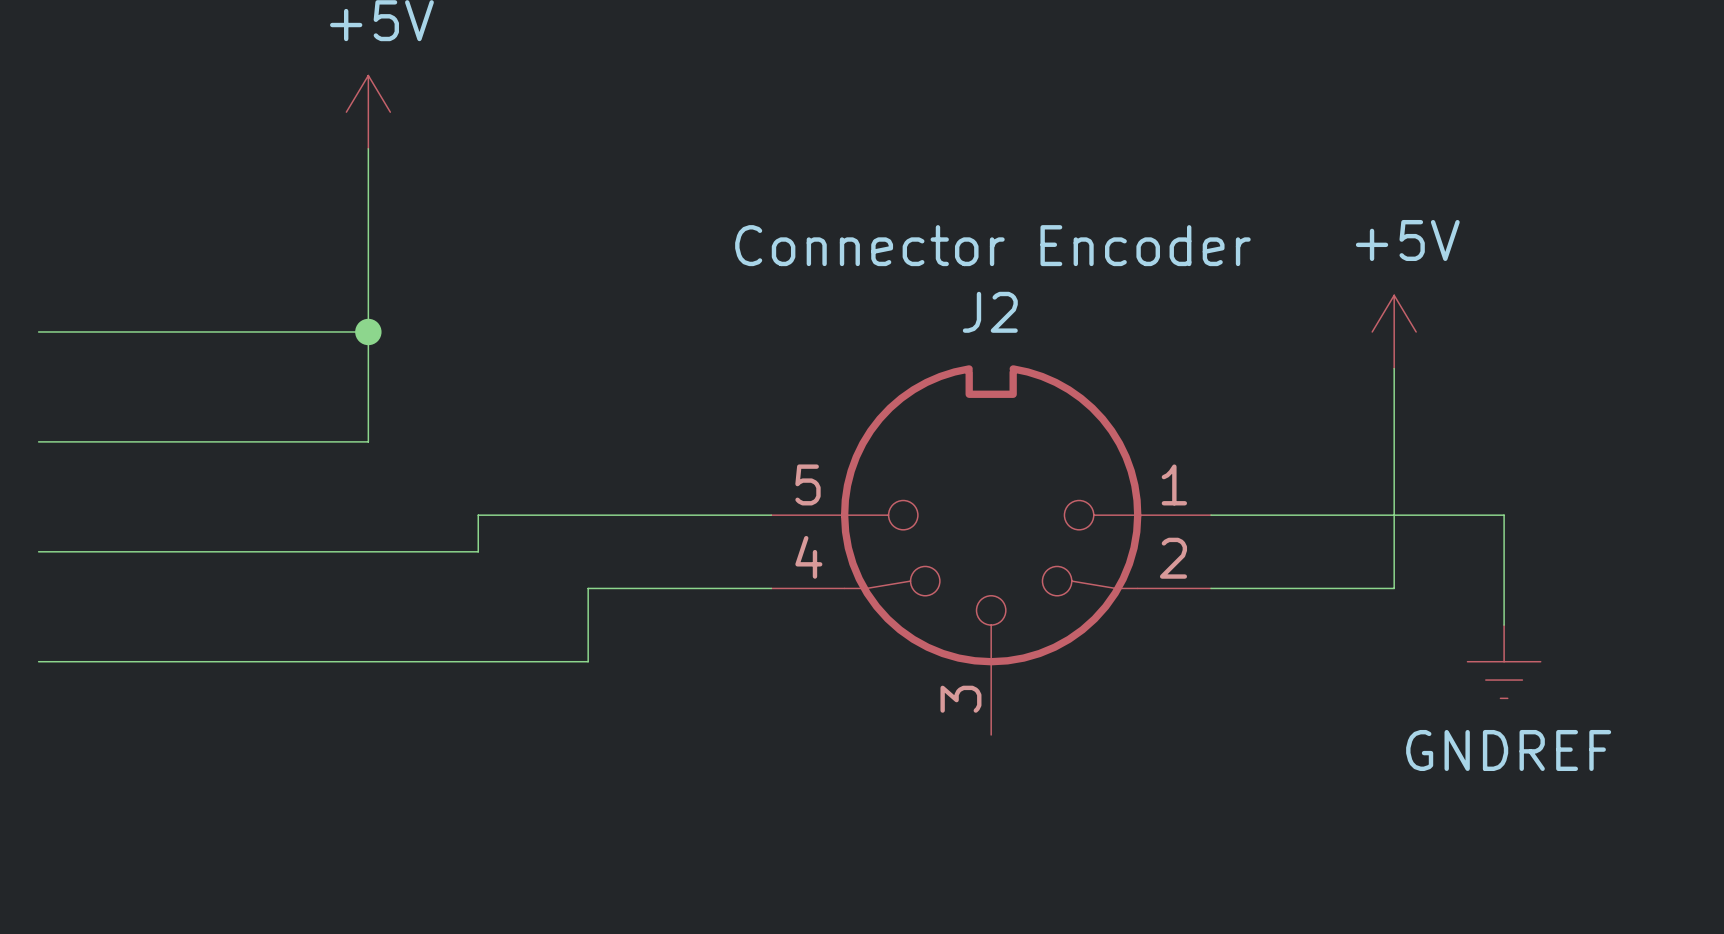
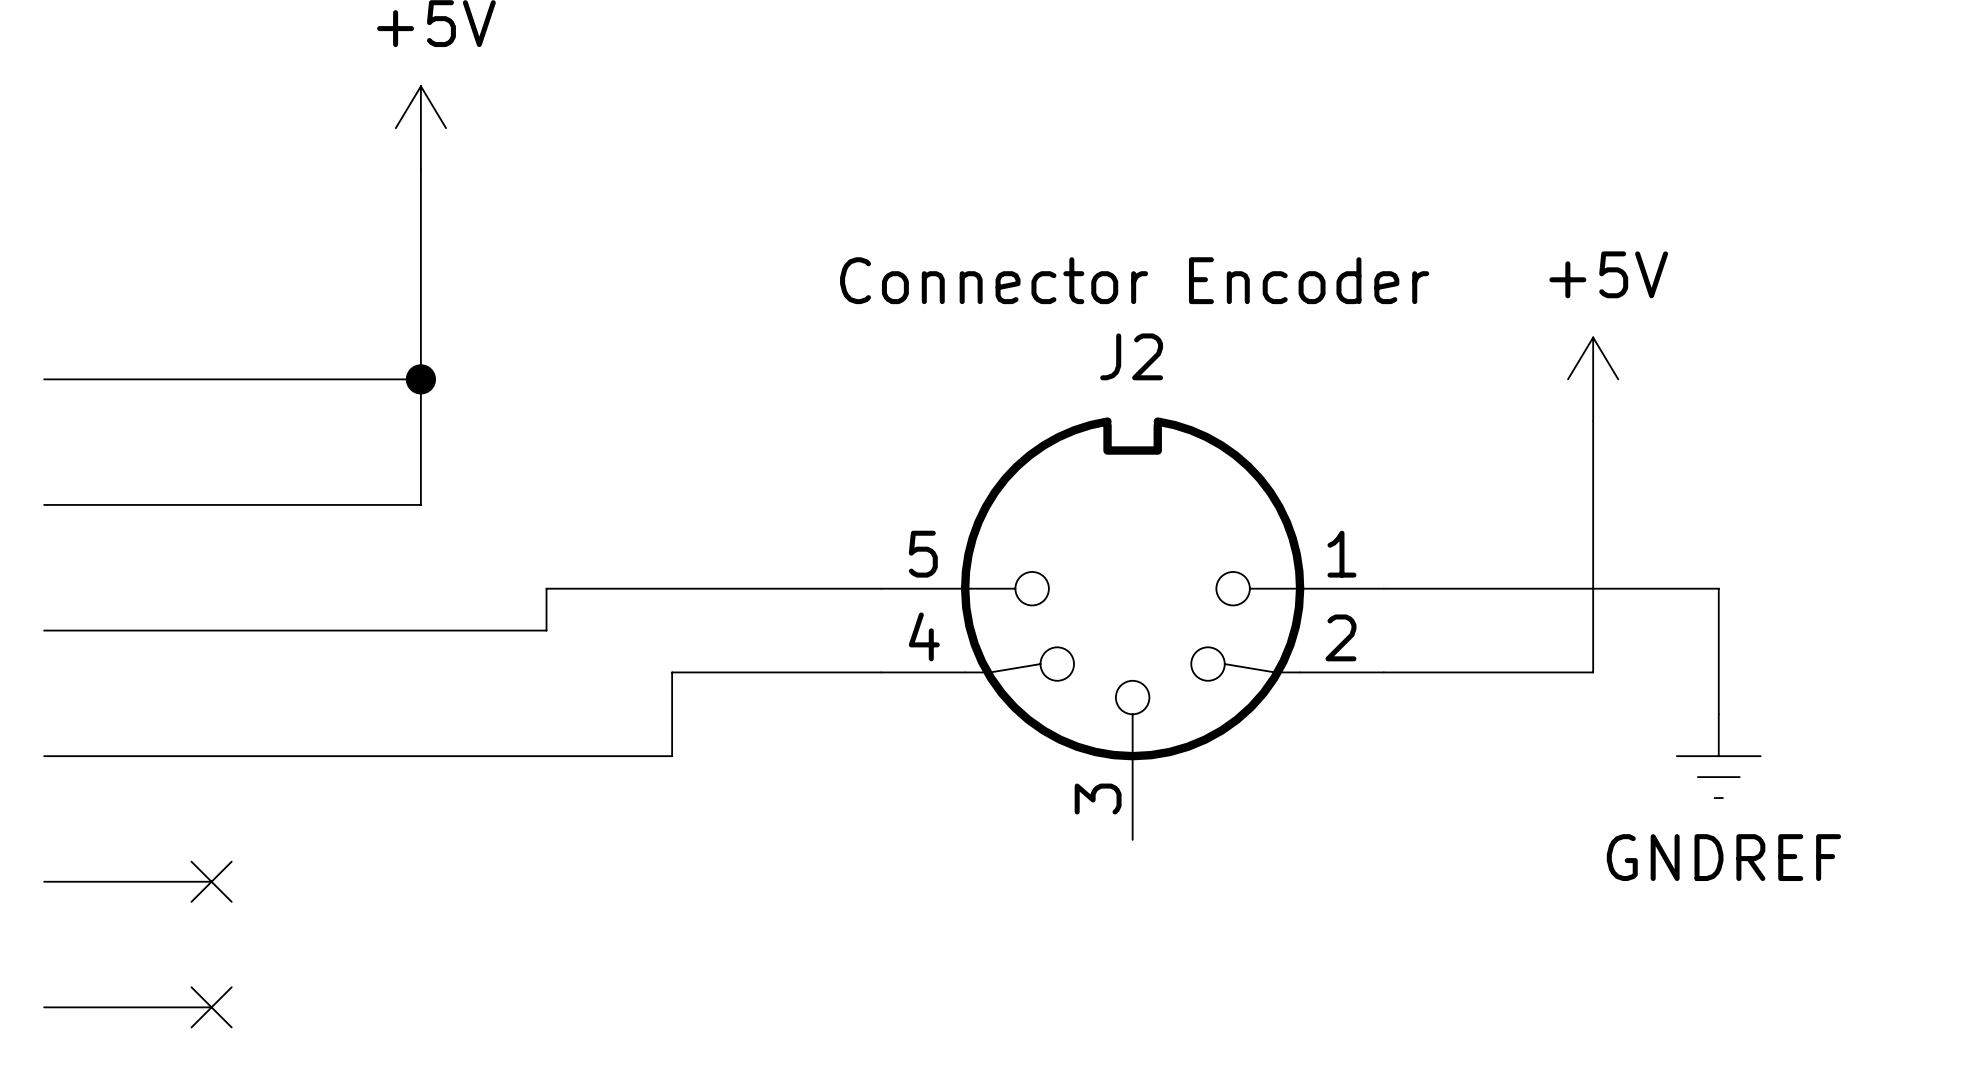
wire: none -> (44, 881) (211, 881)
no-connect mark: none -> (211, 881)
wire: none -> (44, 1007) (211, 1007)
no-connect mark: none -> (211, 1007)

